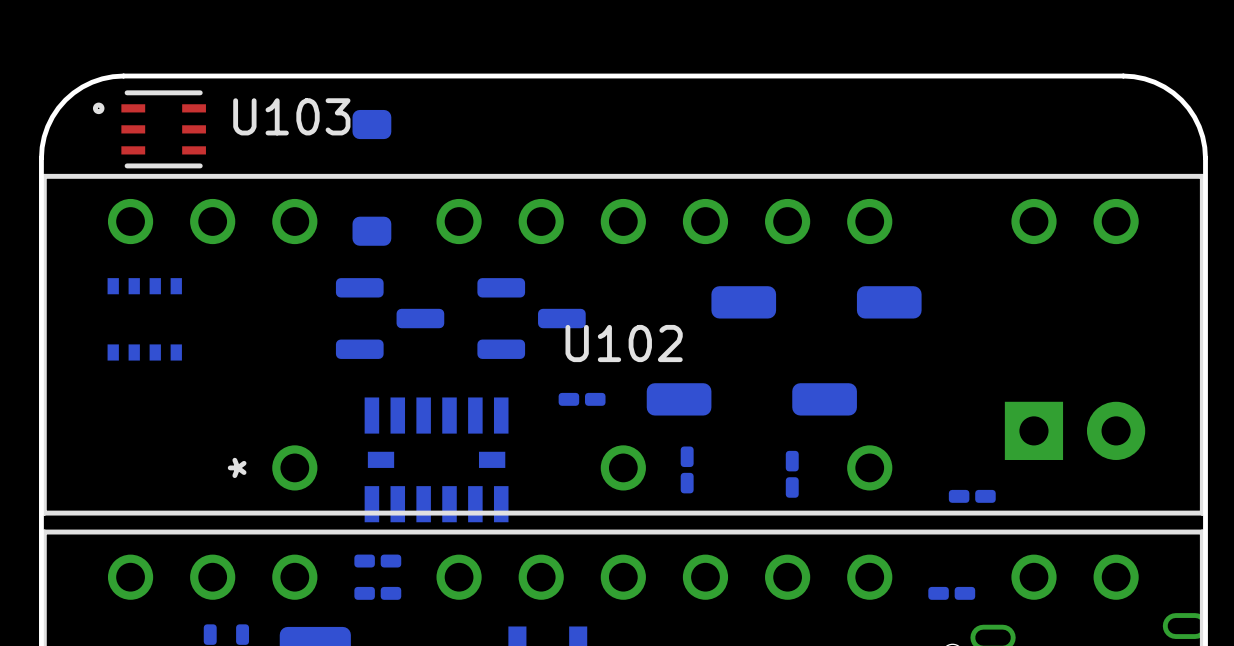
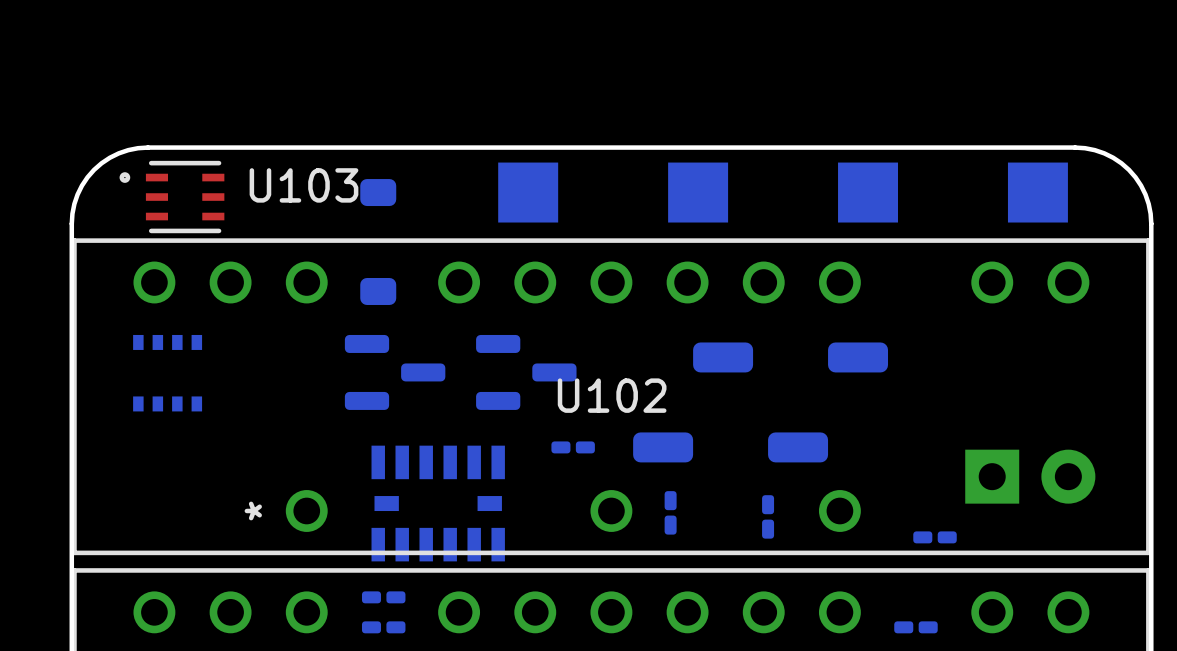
part: none -> (528, 192)
part: none -> (698, 192)
part: none -> (868, 192)
part: none -> (1037, 192)

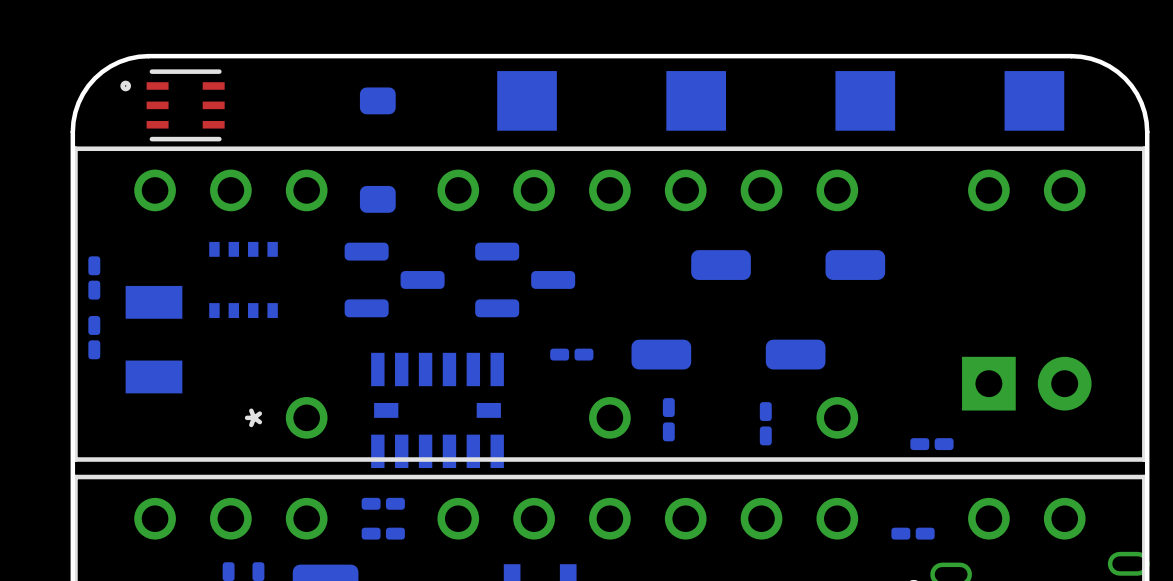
U103 name: U103 (303, 185) -> none
part: none -> (94, 277)
part position: (167, 373) -> (243, 279)
U102 name: U102 (612, 395) -> none
part: none -> (94, 337)
part: none -> (153, 339)

